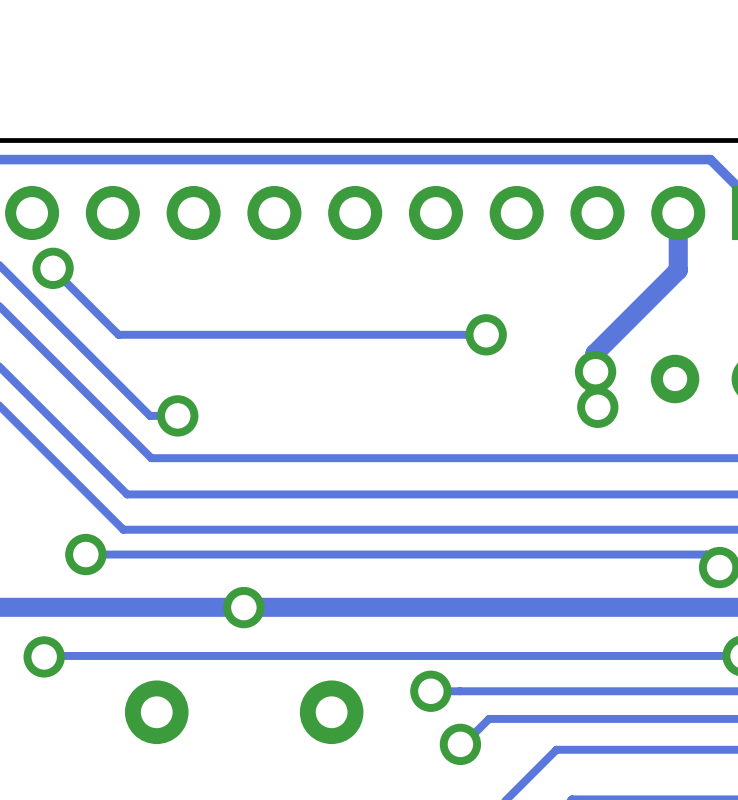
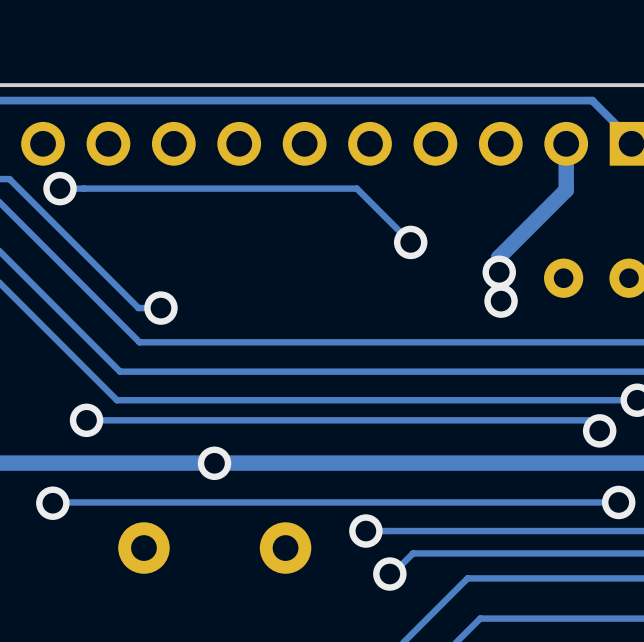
track: (49, 268) (118, 334) (486, 334) -> (60, 188) (356, 188) (410, 242)

